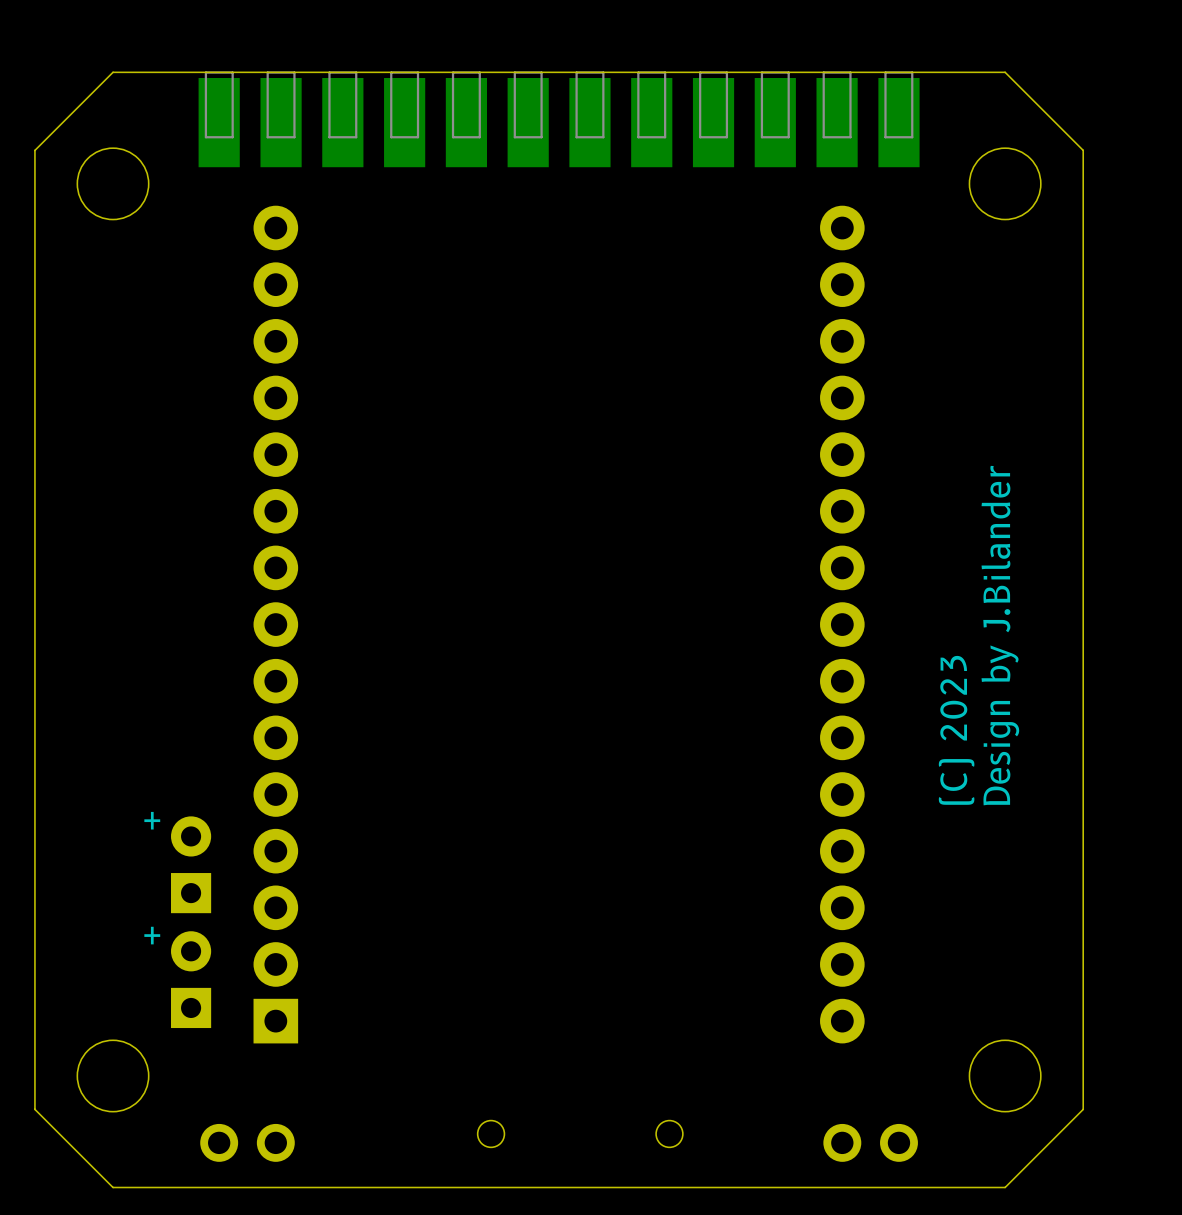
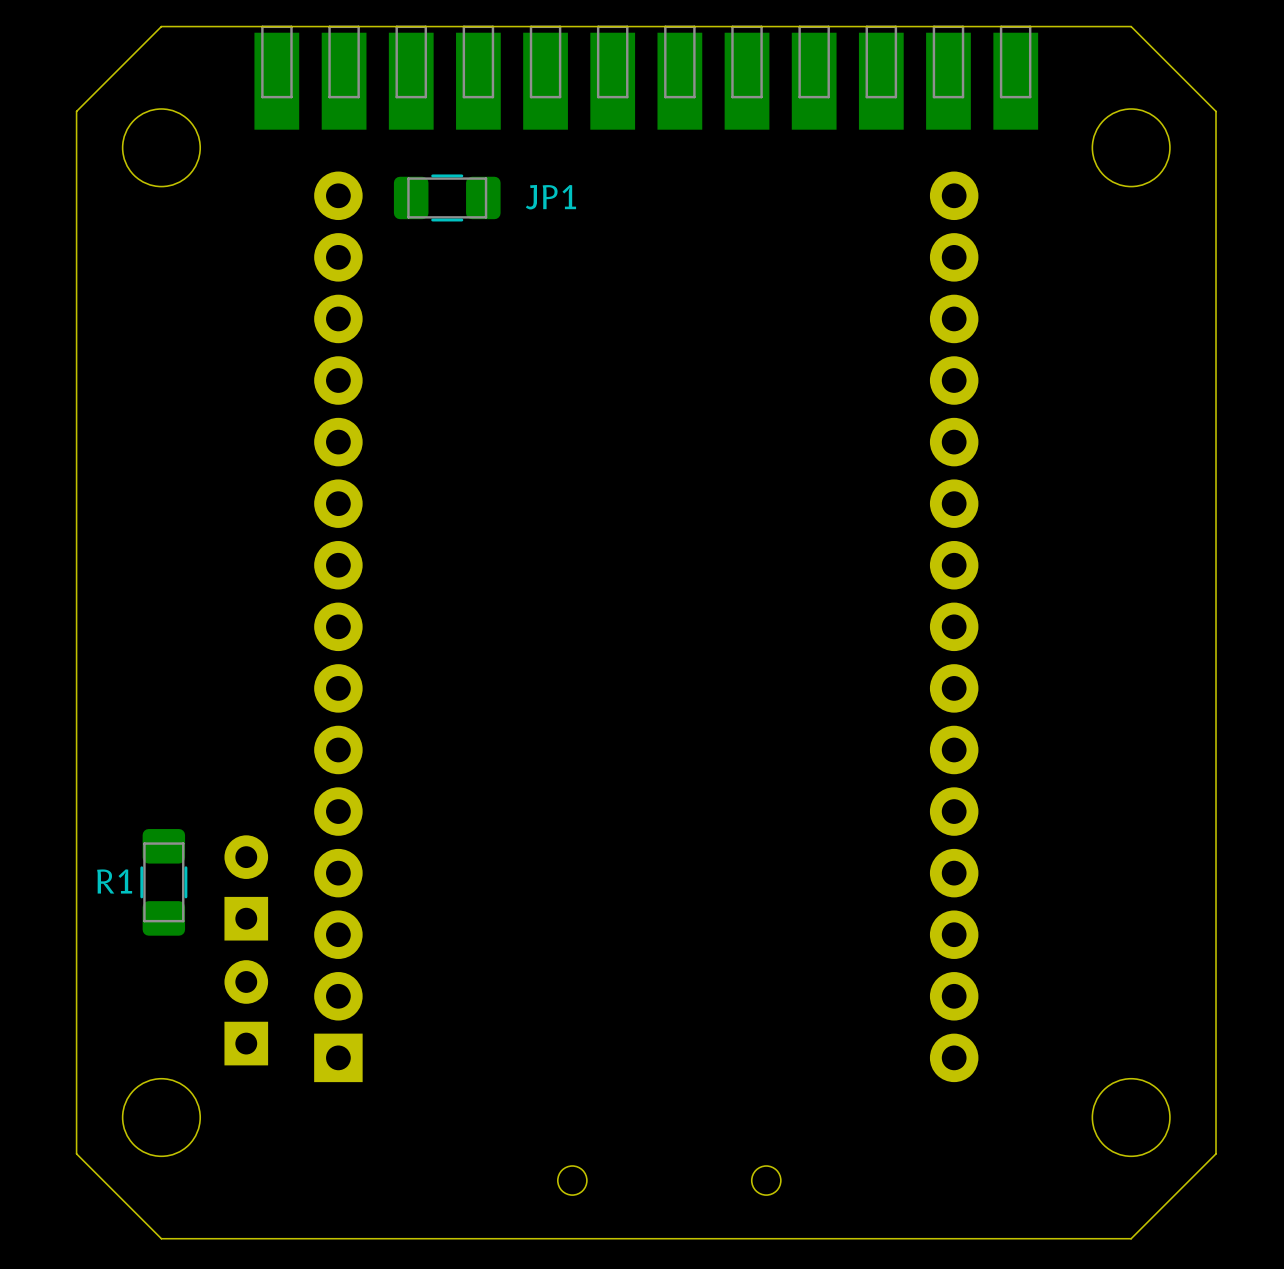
JP1: none -> (447, 197)
text: Design by J.Bilander (1000, 635) -> none
text: (C) 2023 (956, 730) -> none
text: + (152, 820) -> none
R1: none -> (163, 882)
text: + (152, 935) -> none
part: (247, 1142) -> none
part: (870, 1142) -> none

